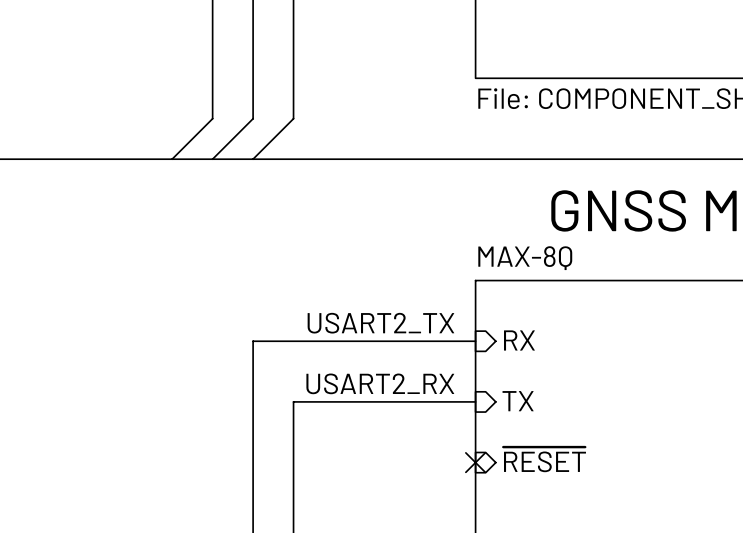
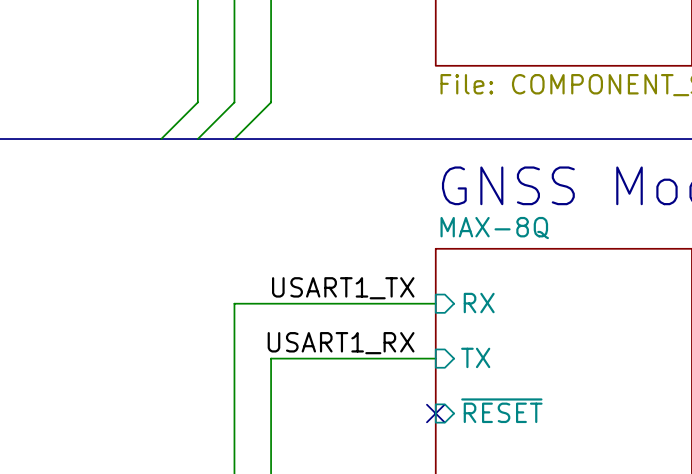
label: USART2_TX (380, 323) -> USART1_TX (343, 288)
label: USART2_RX (380, 383) -> USART1_RX (341, 343)

